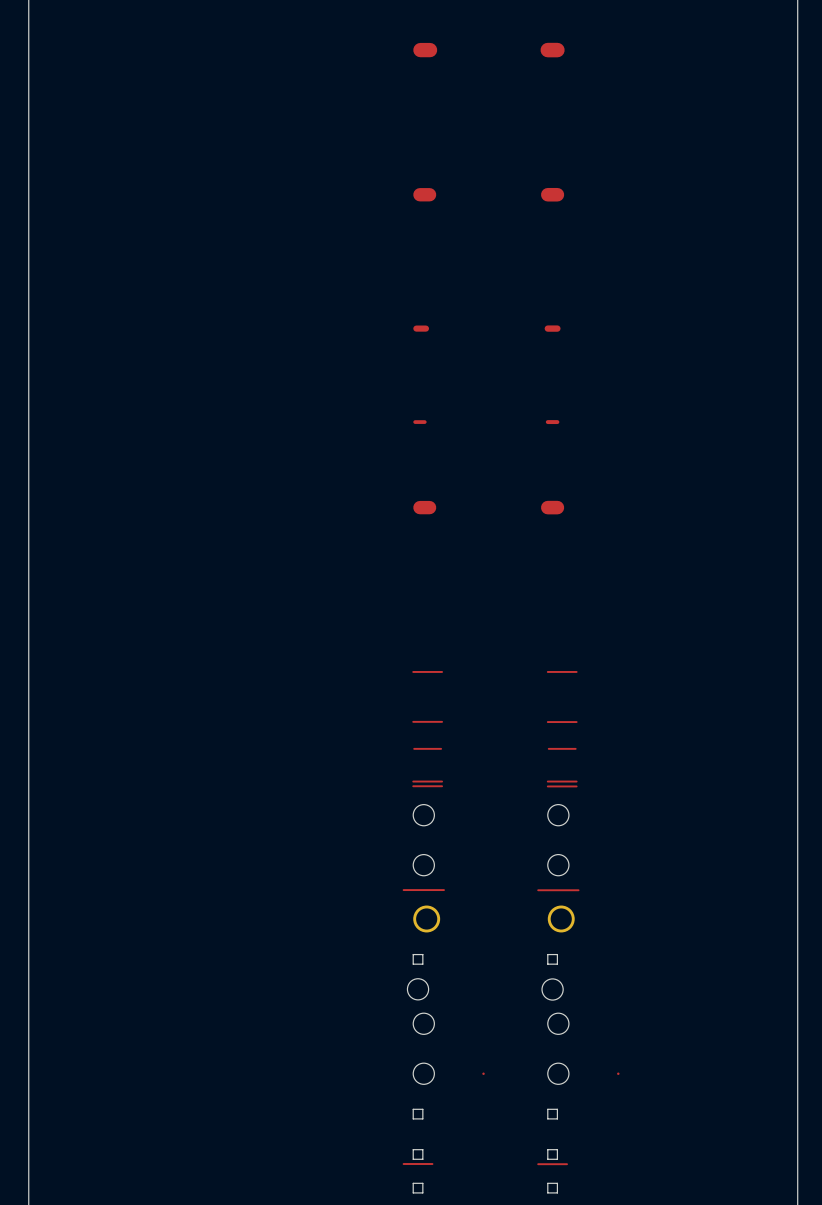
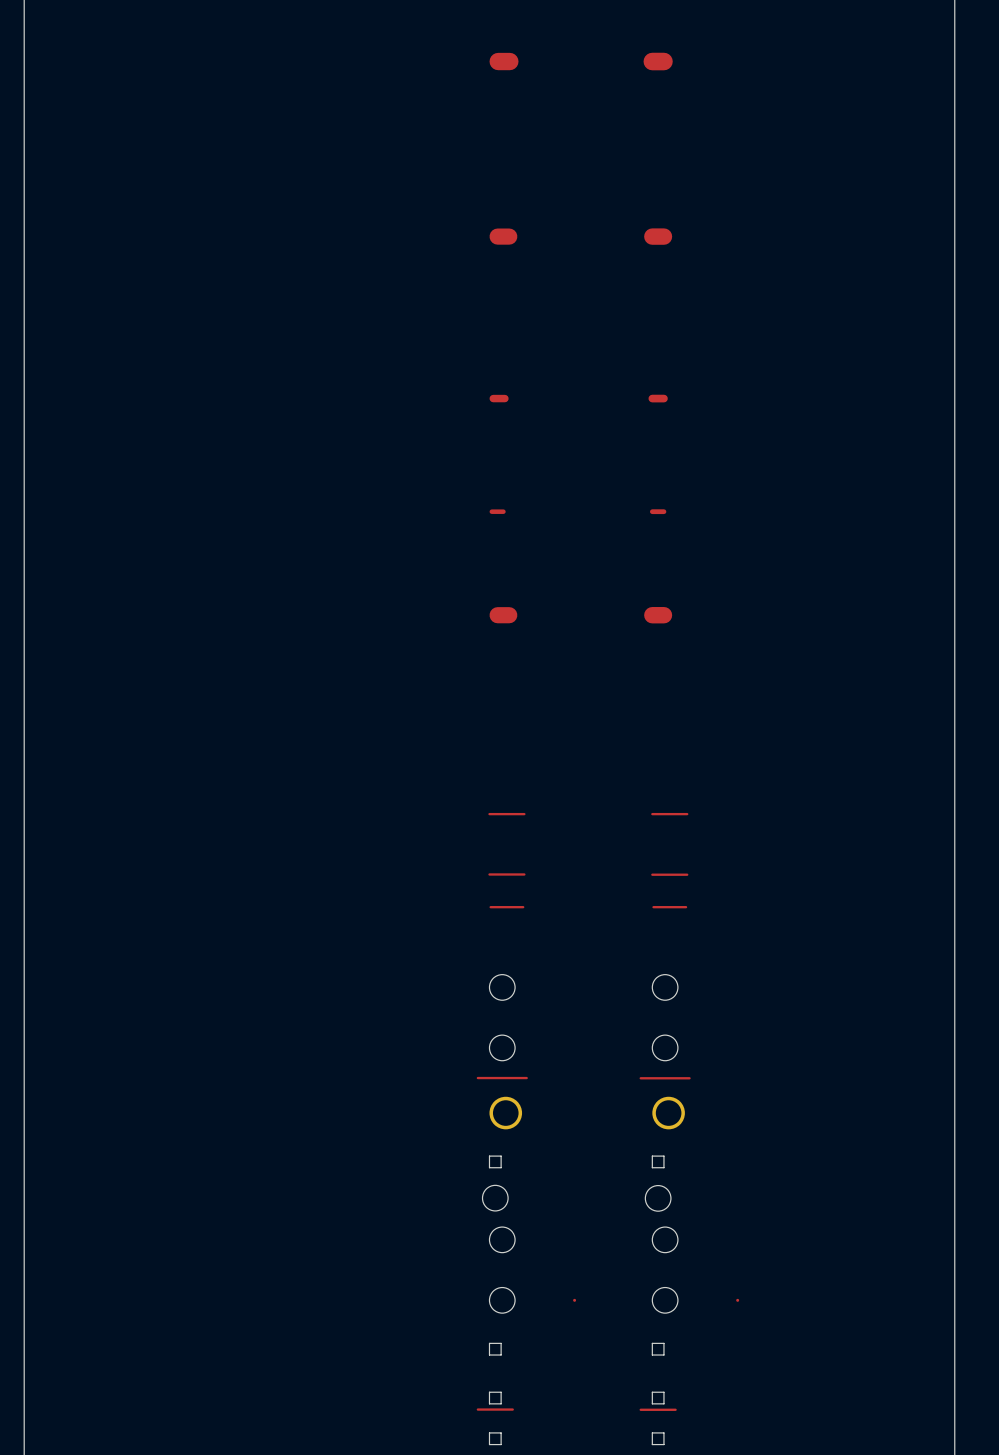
top track: (413, 781) (442, 781) -> none
top track: (547, 781) (576, 781) -> none
top track: (413, 786) (442, 786) -> none
top track: (547, 786) (576, 786) -> none

